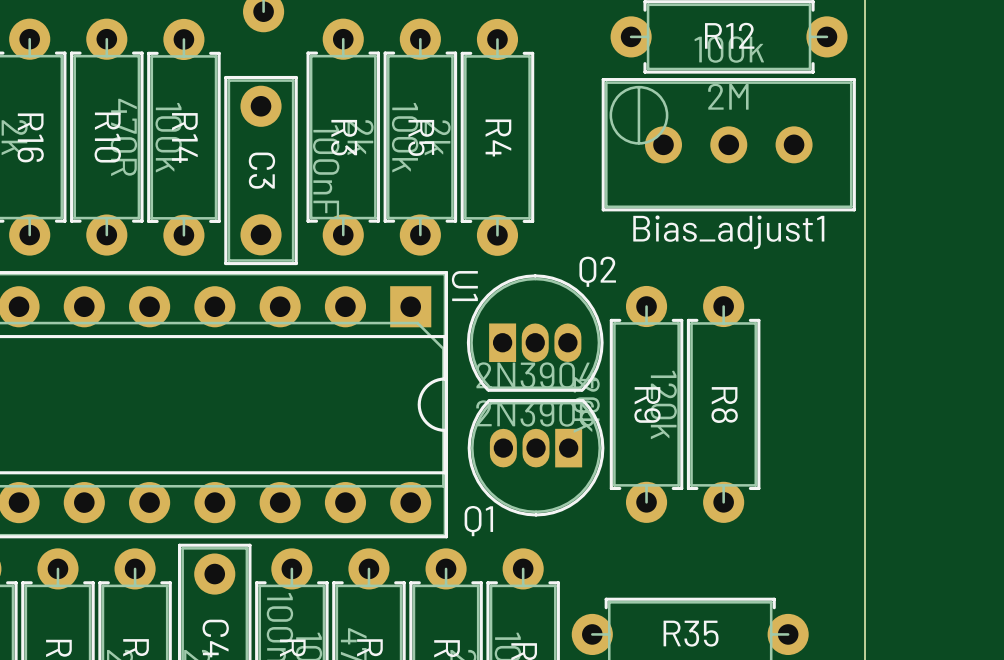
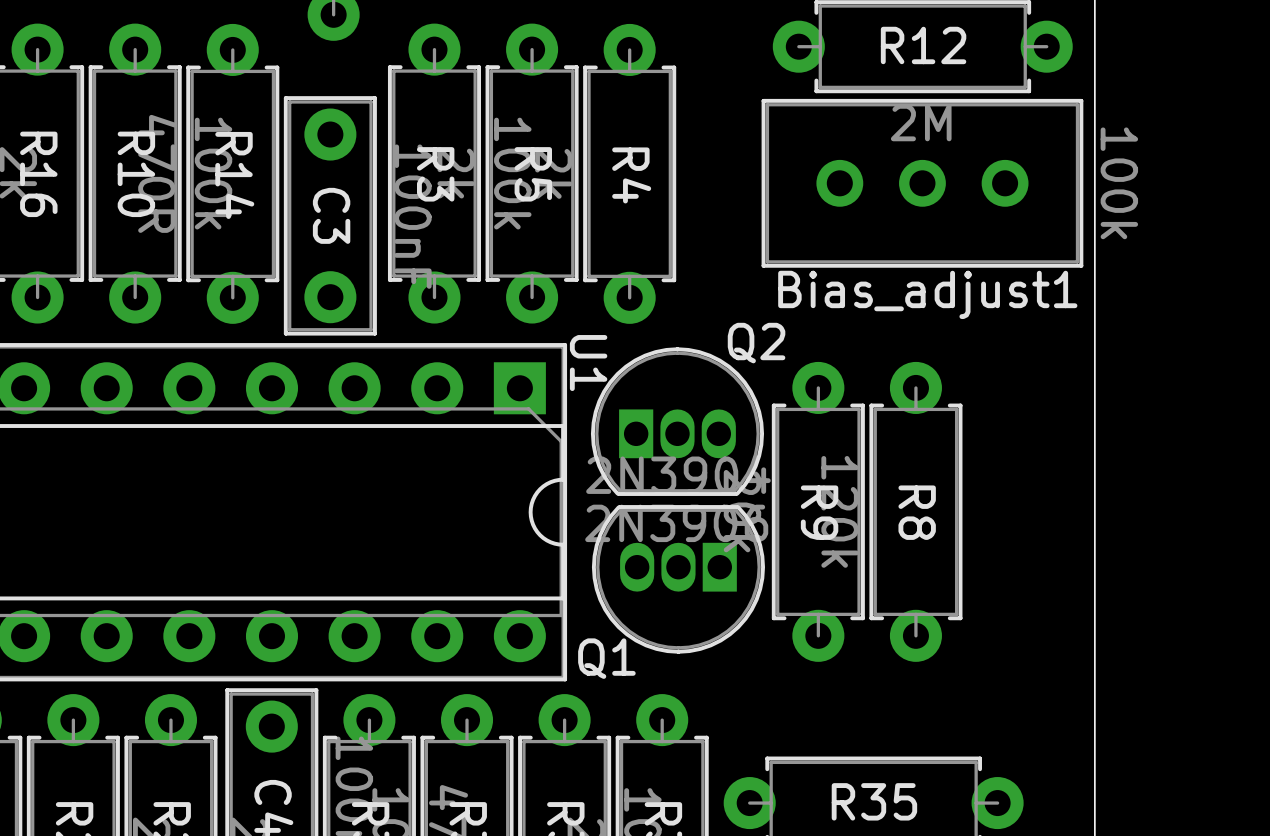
Bias_adjust1 value position: 100k (729, 49) -> 100k (1119, 183)
Bias_adjust1 footprint: [601, 78, 856, 212] -> [761, 98, 1084, 268]

